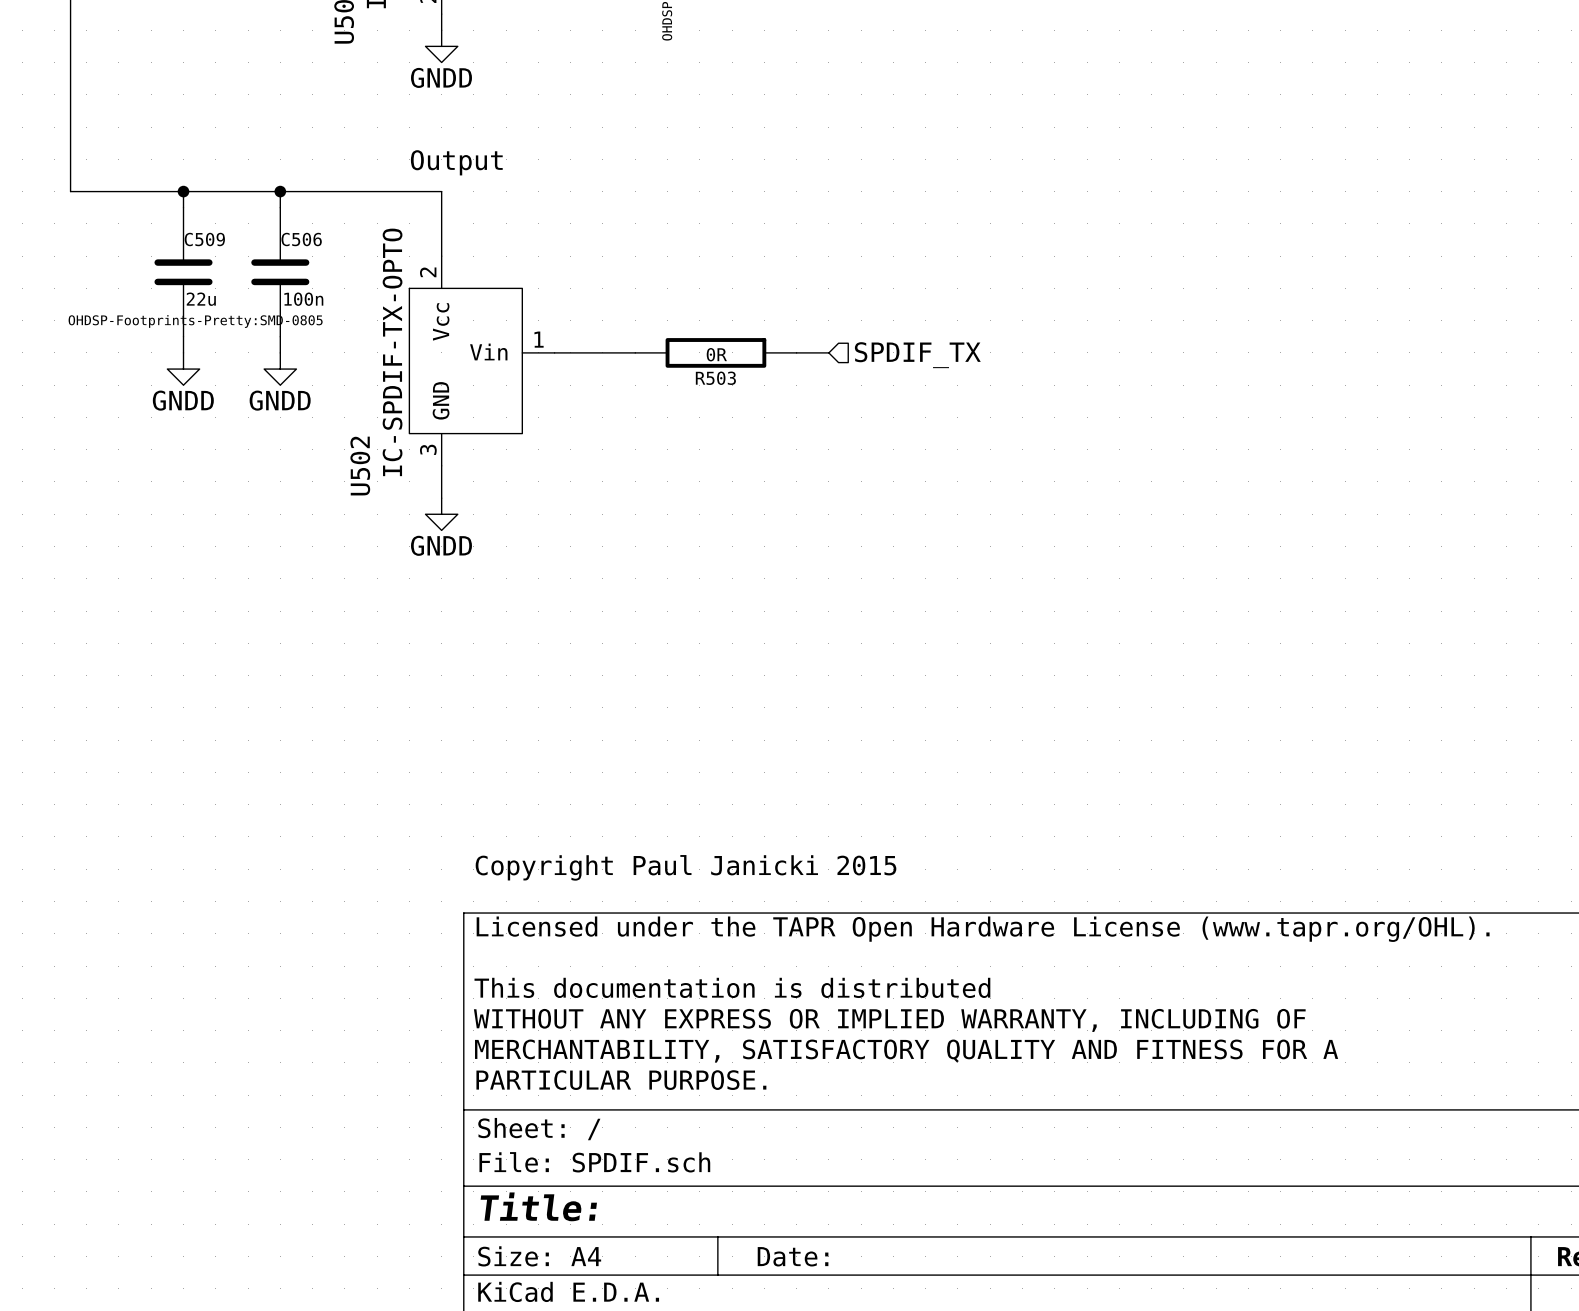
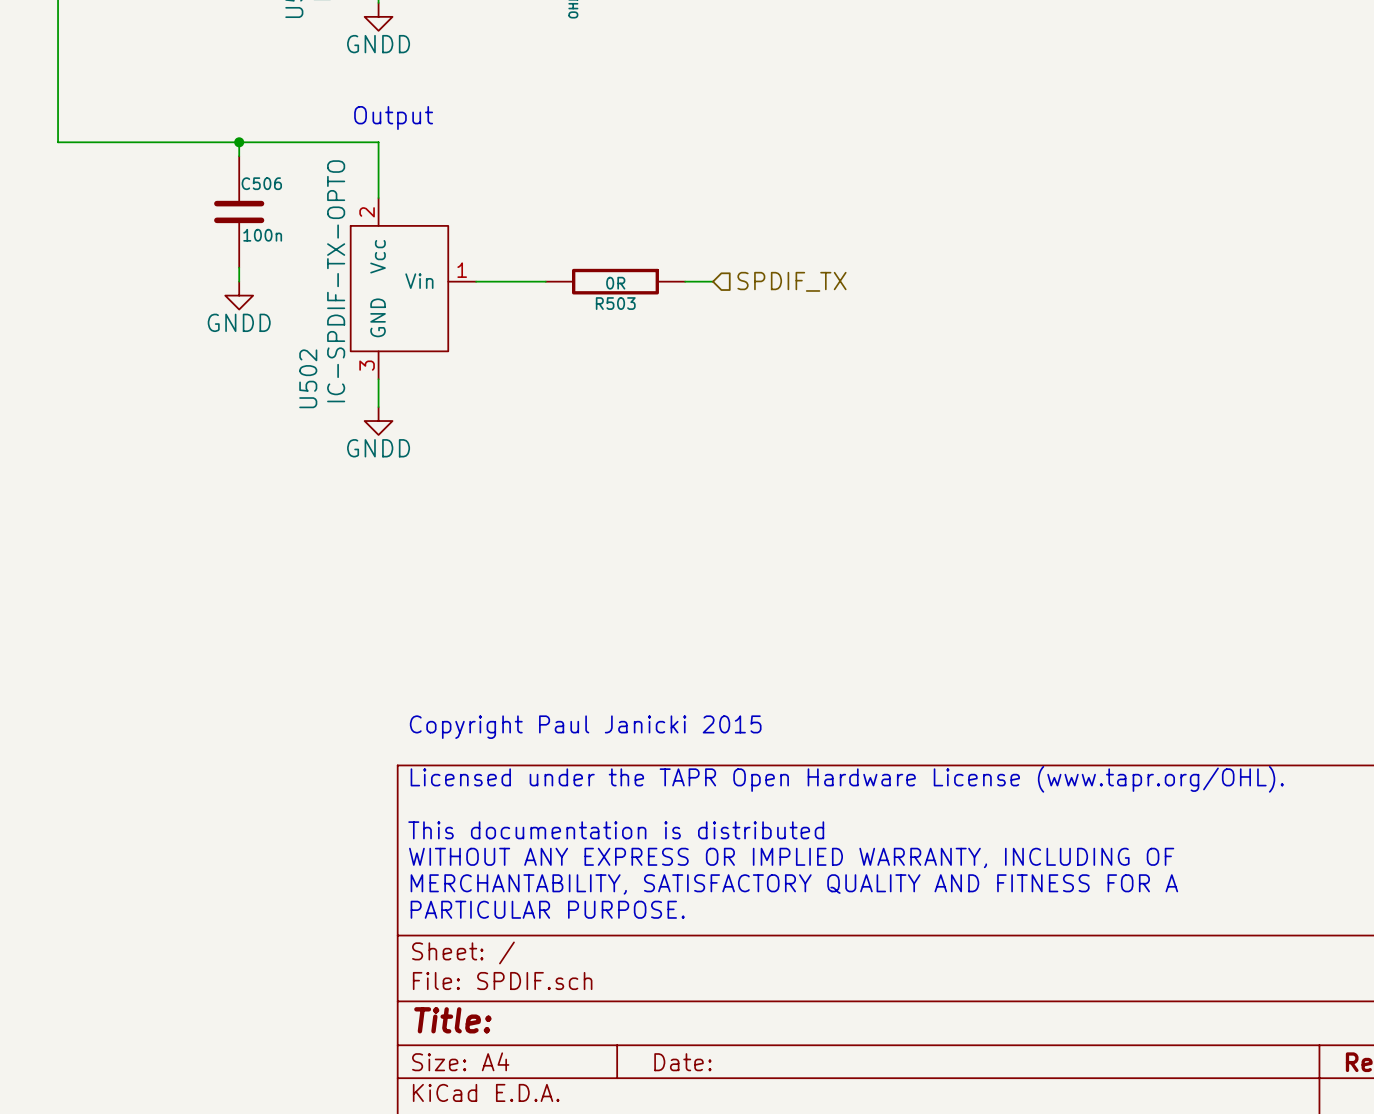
wire: (183, 191) (183, 207) -> none
junction: (183, 191) -> none
C509: 22u (183, 272) -> none
wire: (183, 336) (183, 352) -> none
power symbol: GNDD (183, 369) -> none

